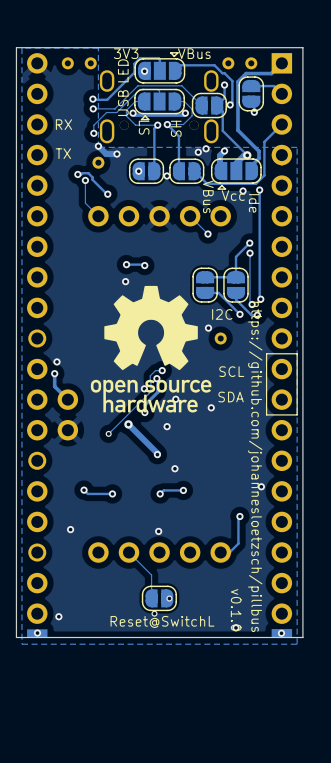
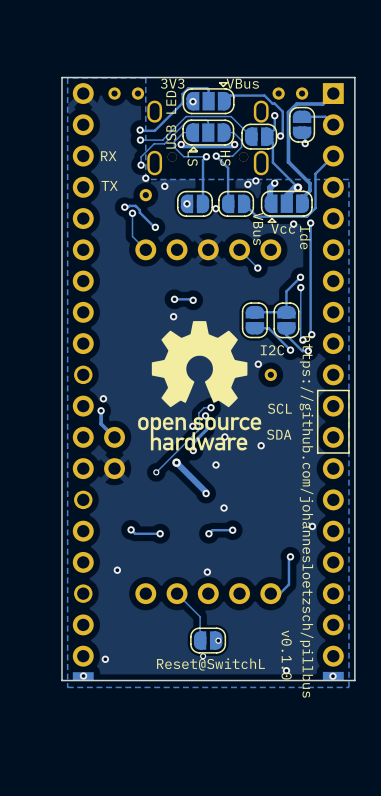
track: (98, 146) (106, 154) (116, 154) -> none

